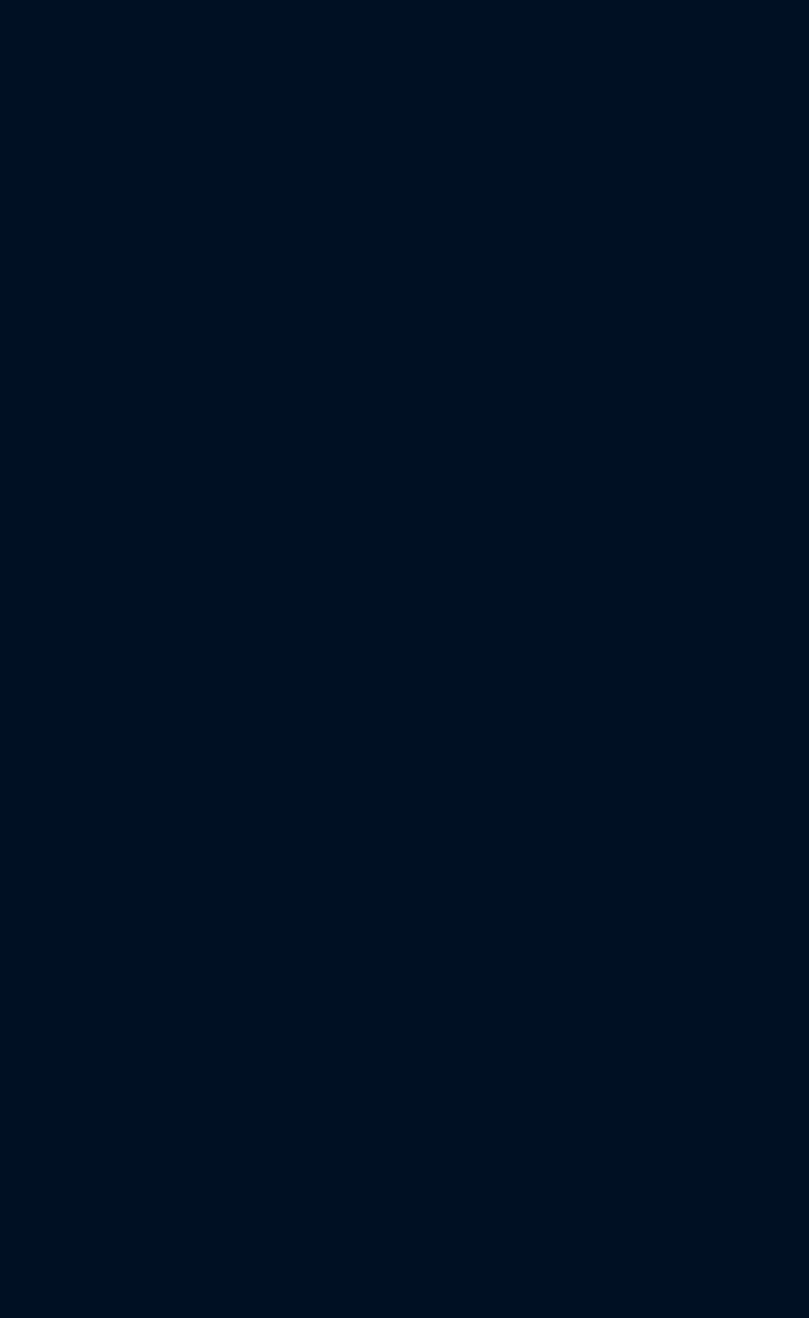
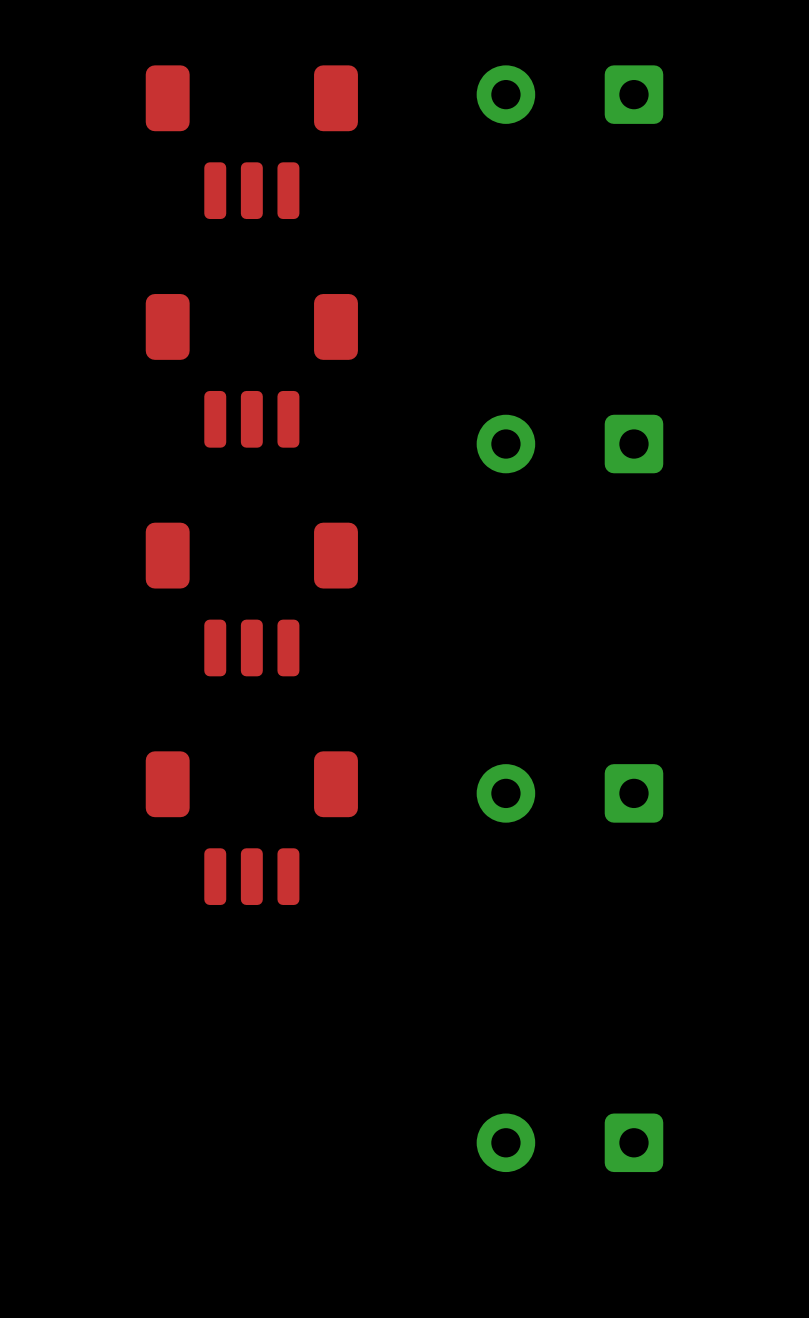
part: none -> (569, 94)
part: none -> (251, 142)
part: none -> (251, 370)
part: none -> (569, 444)
part: none -> (251, 599)
part: none -> (569, 793)
part: none -> (251, 828)
part: none -> (569, 1142)

